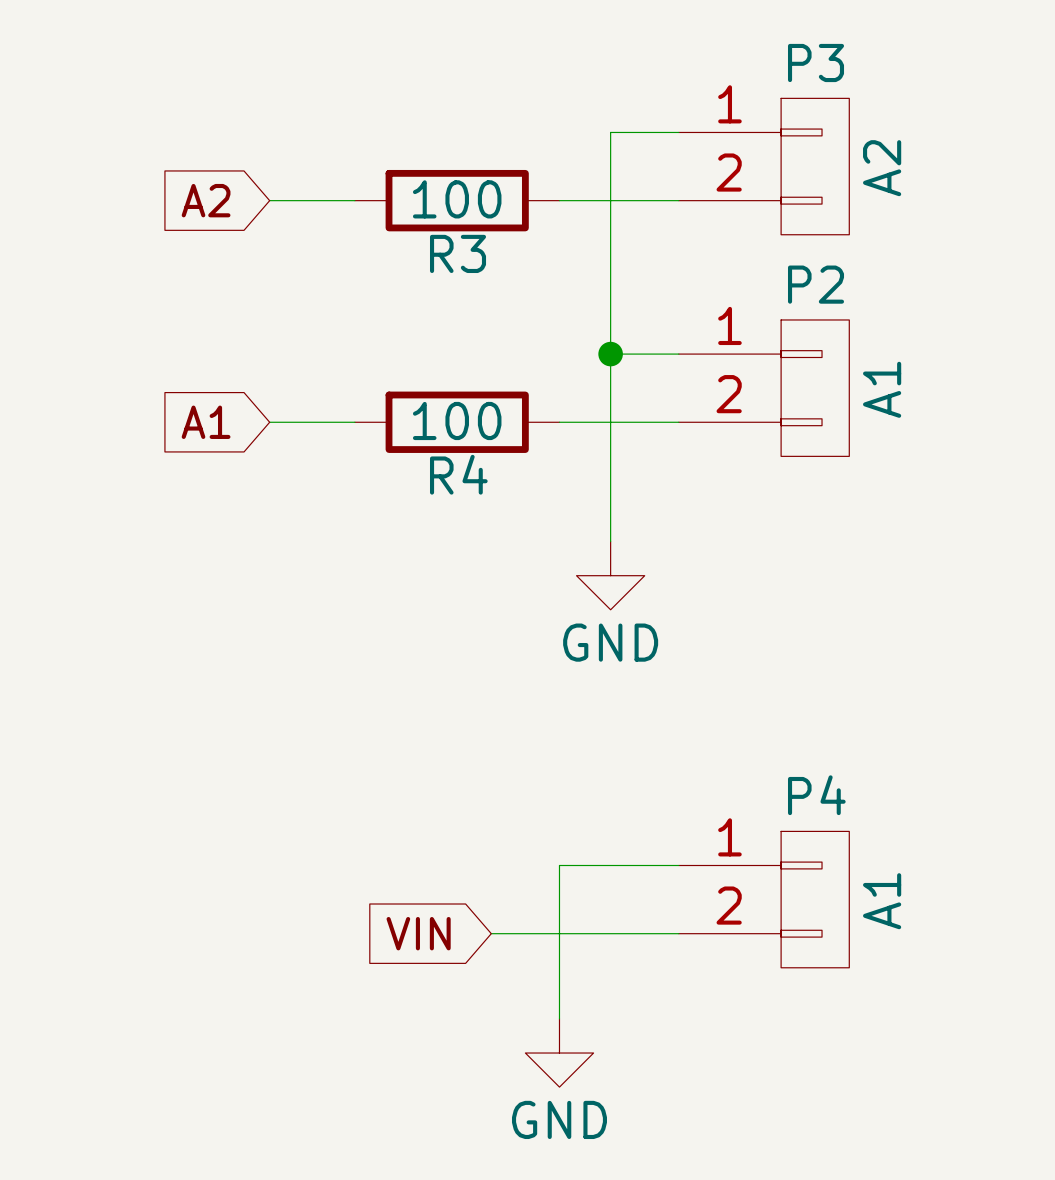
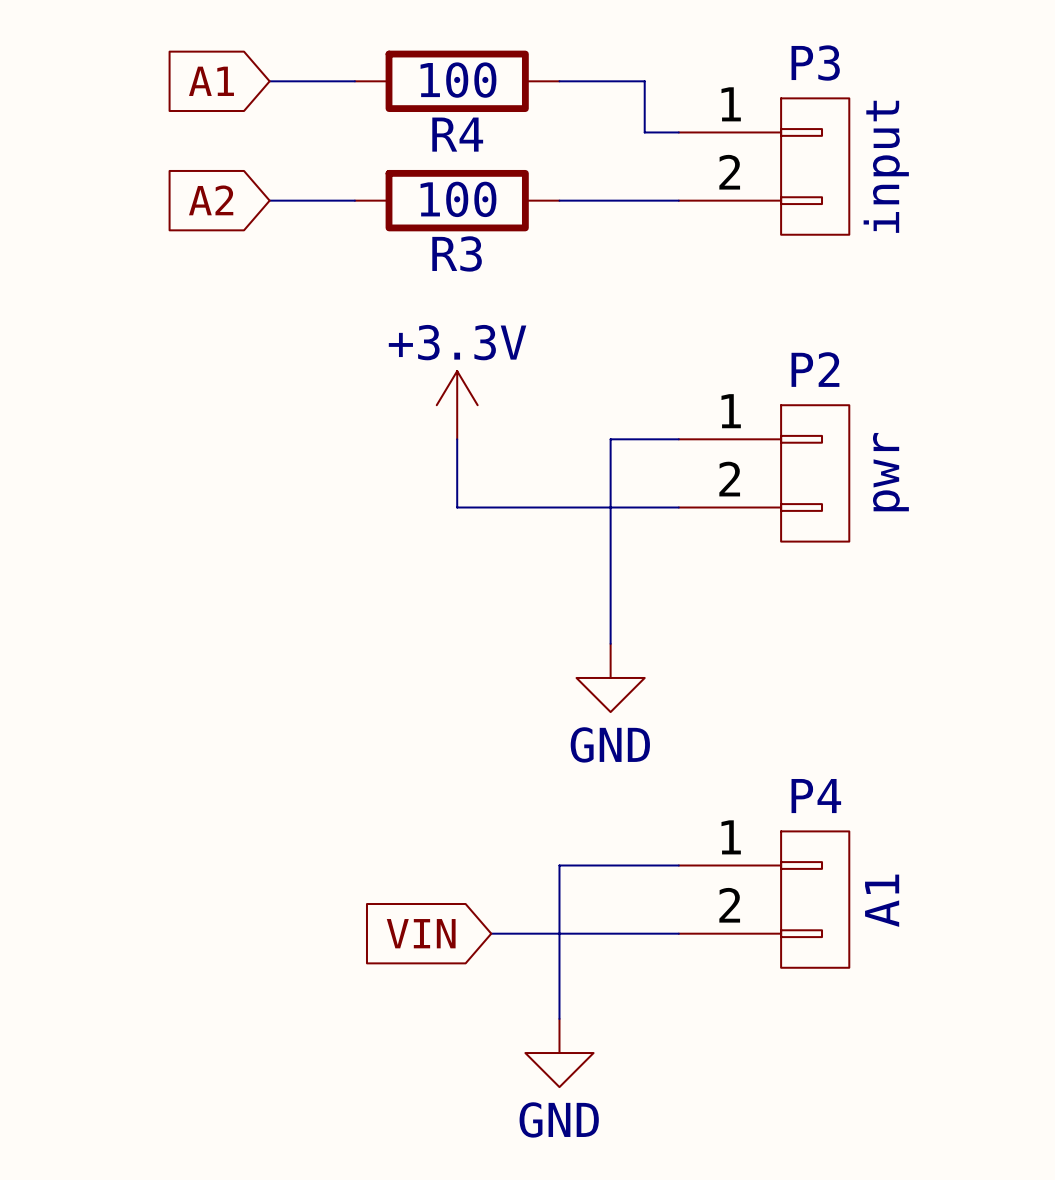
wire: none -> (559, 81) (644, 81) (644, 132)
wire: (644, 132) (610, 132) (610, 439) -> (678, 439) (610, 439)
P3 value: A2 (882, 168) -> input (886, 166)
wire: (610, 354) (678, 354) -> none
junction: (610, 354) -> none
P2 position: (764, 388) -> (764, 473)
P2 value: A1 (882, 389) -> pwr (890, 472)
power symbol: none -> +3.3V (457, 405)
global label position: A1 (206, 422) -> A1 (211, 81)
wire: (269, 422) (354, 422) -> (269, 81) (354, 81)
R4 position: (457, 422) -> (457, 81)
wire: (559, 422) (678, 422) -> none
wire: none -> (457, 439) (457, 507) (678, 507)
wire: none -> (610, 541) (610, 643)
power symbol position: GND (610, 575) -> GND (610, 677)

